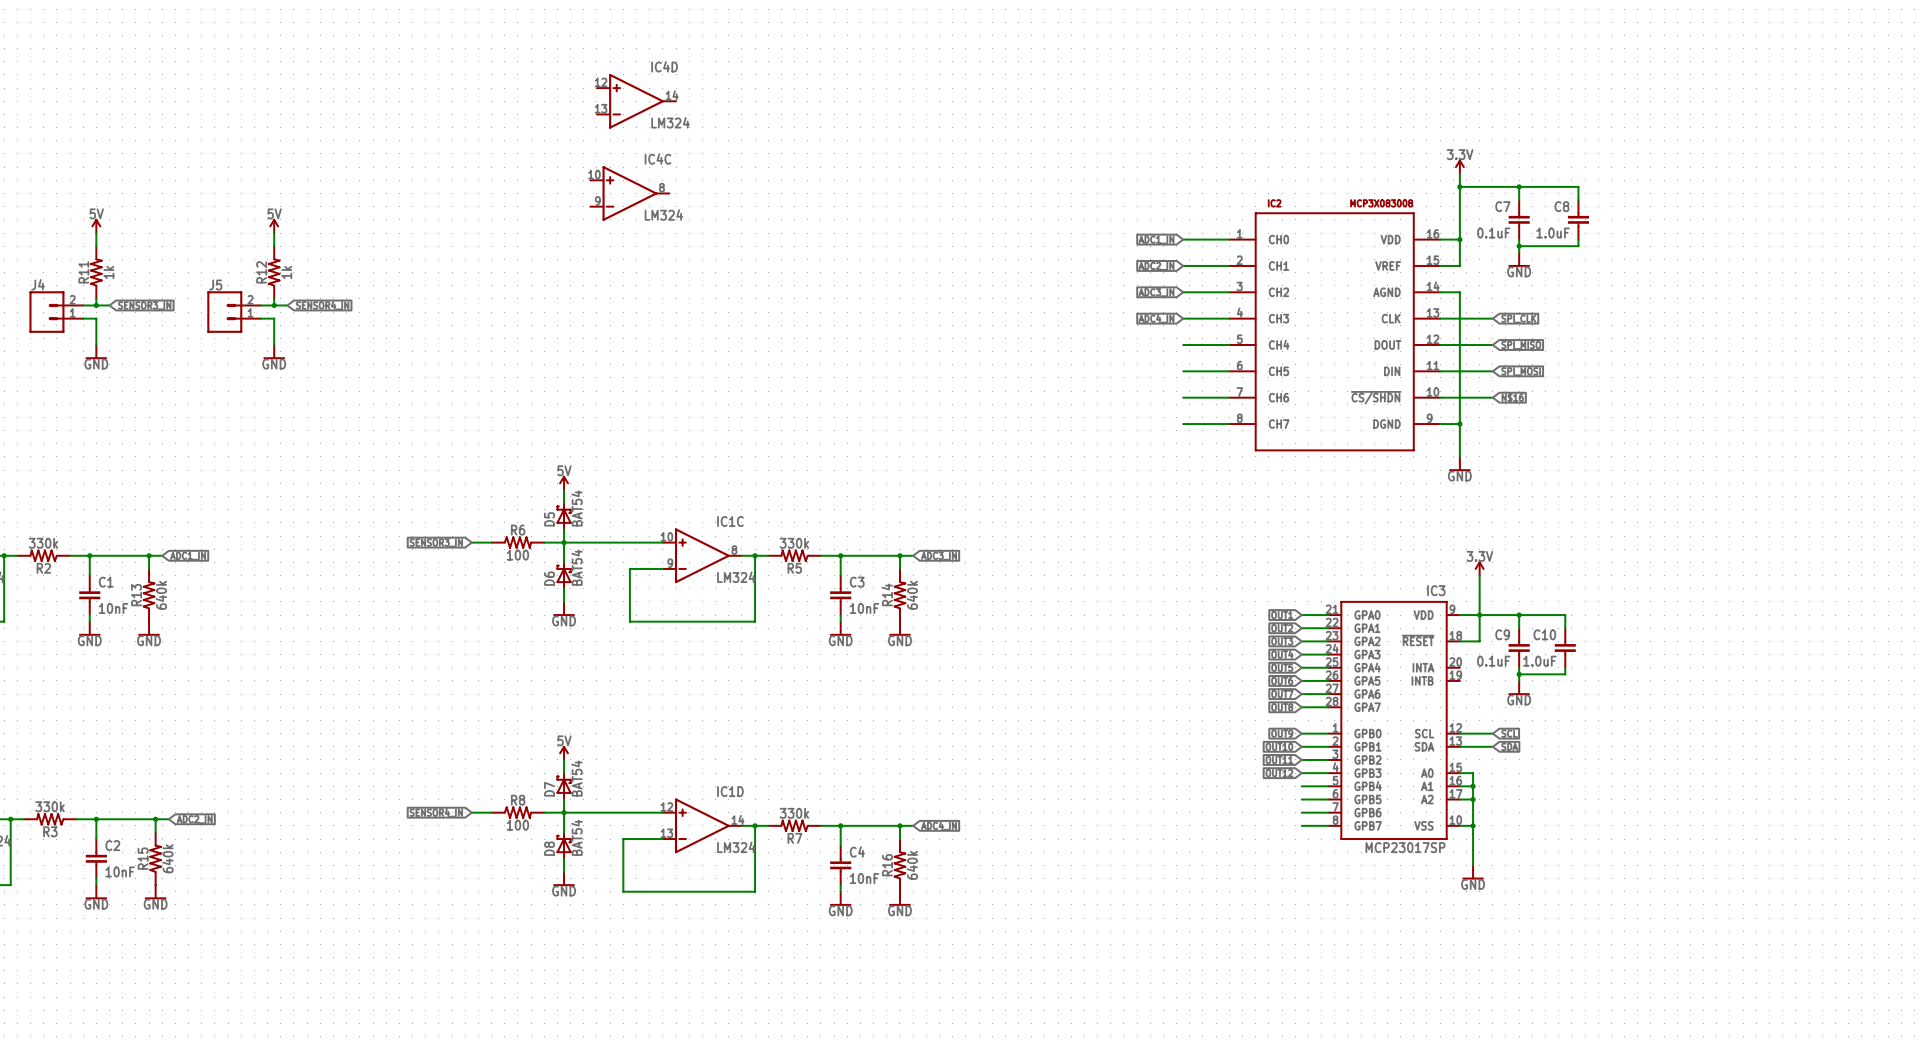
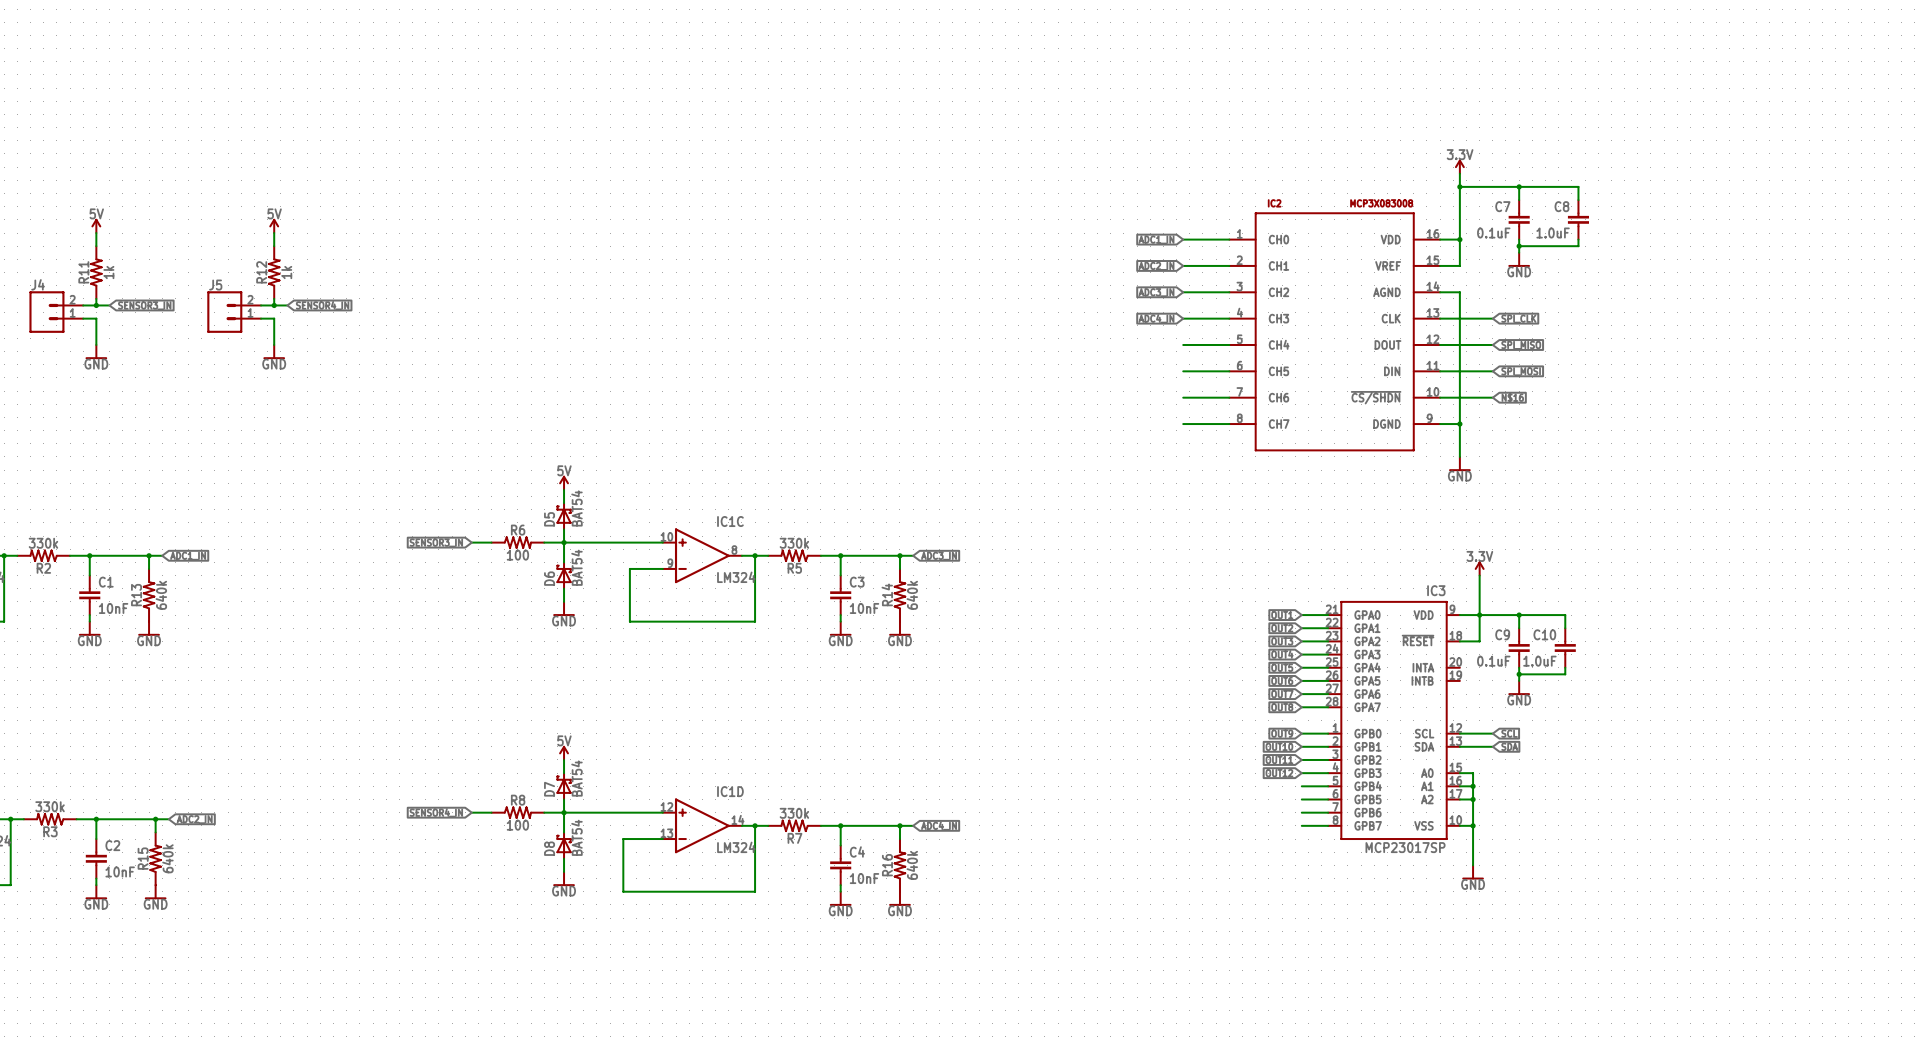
IC4D: LM324 (636, 101) -> none
IC4C: LM324 (629, 193) -> none

